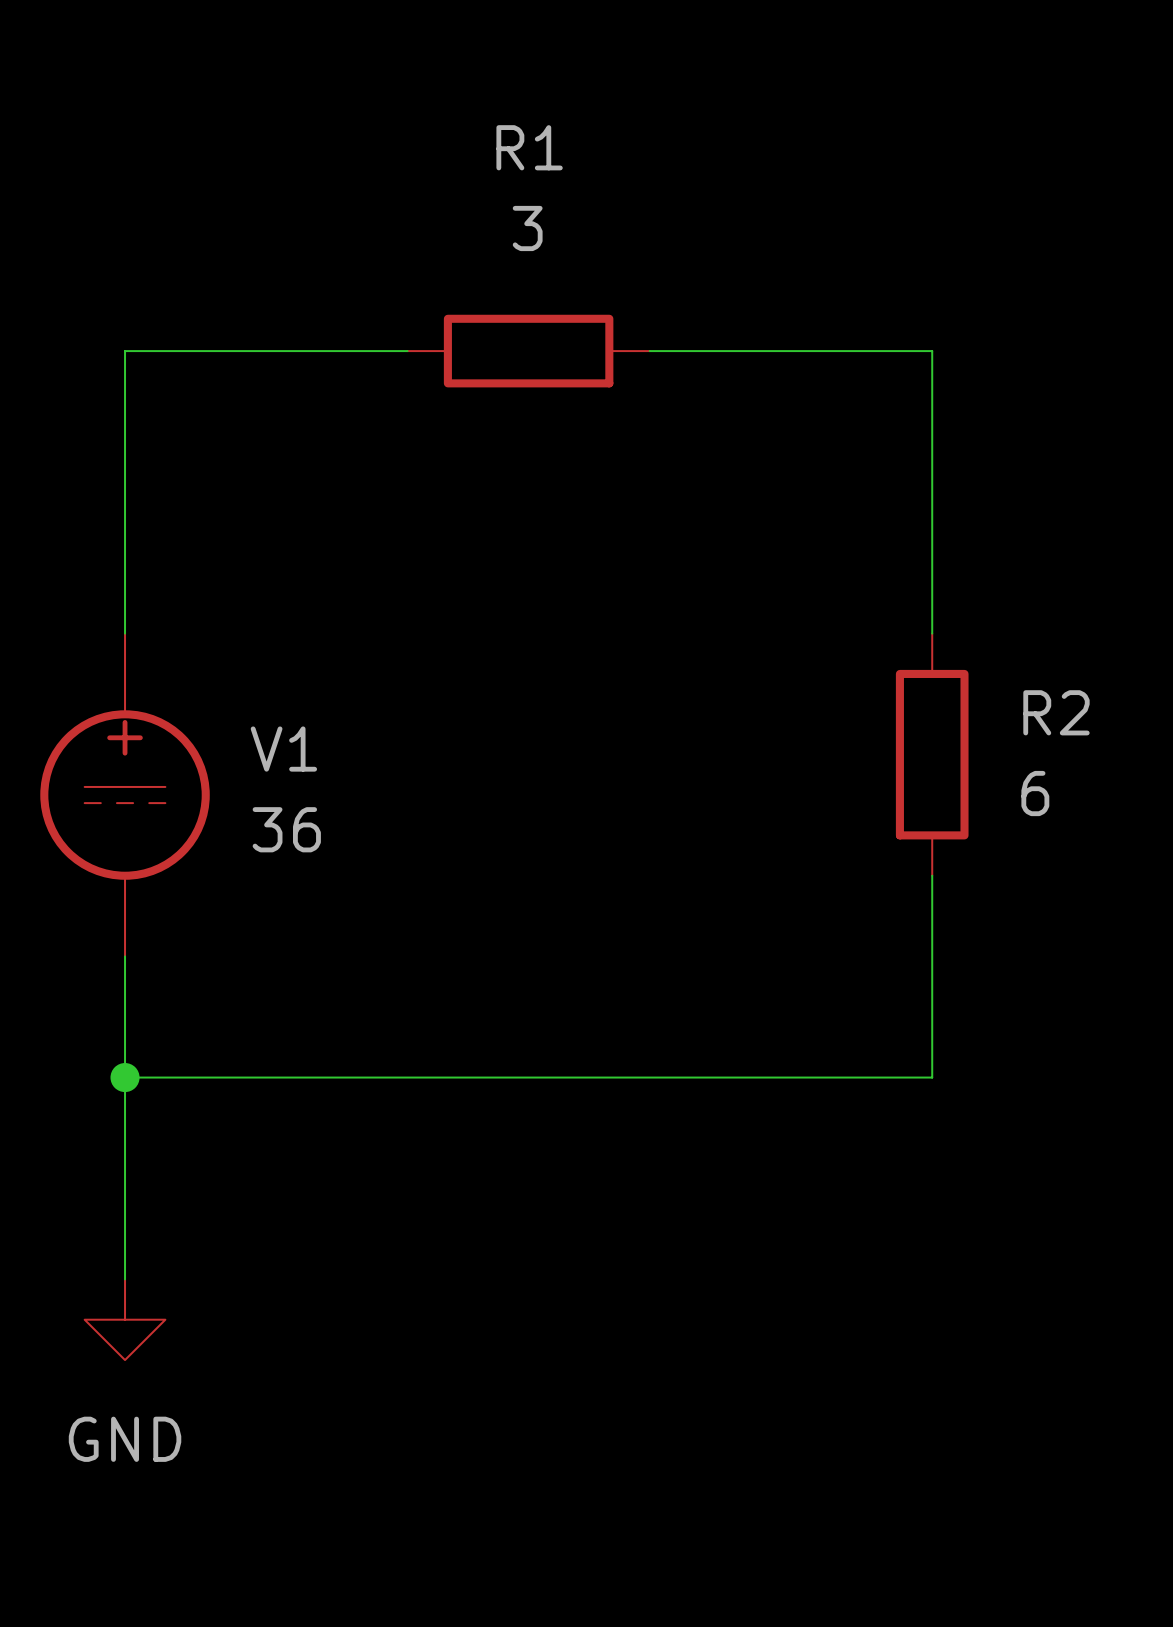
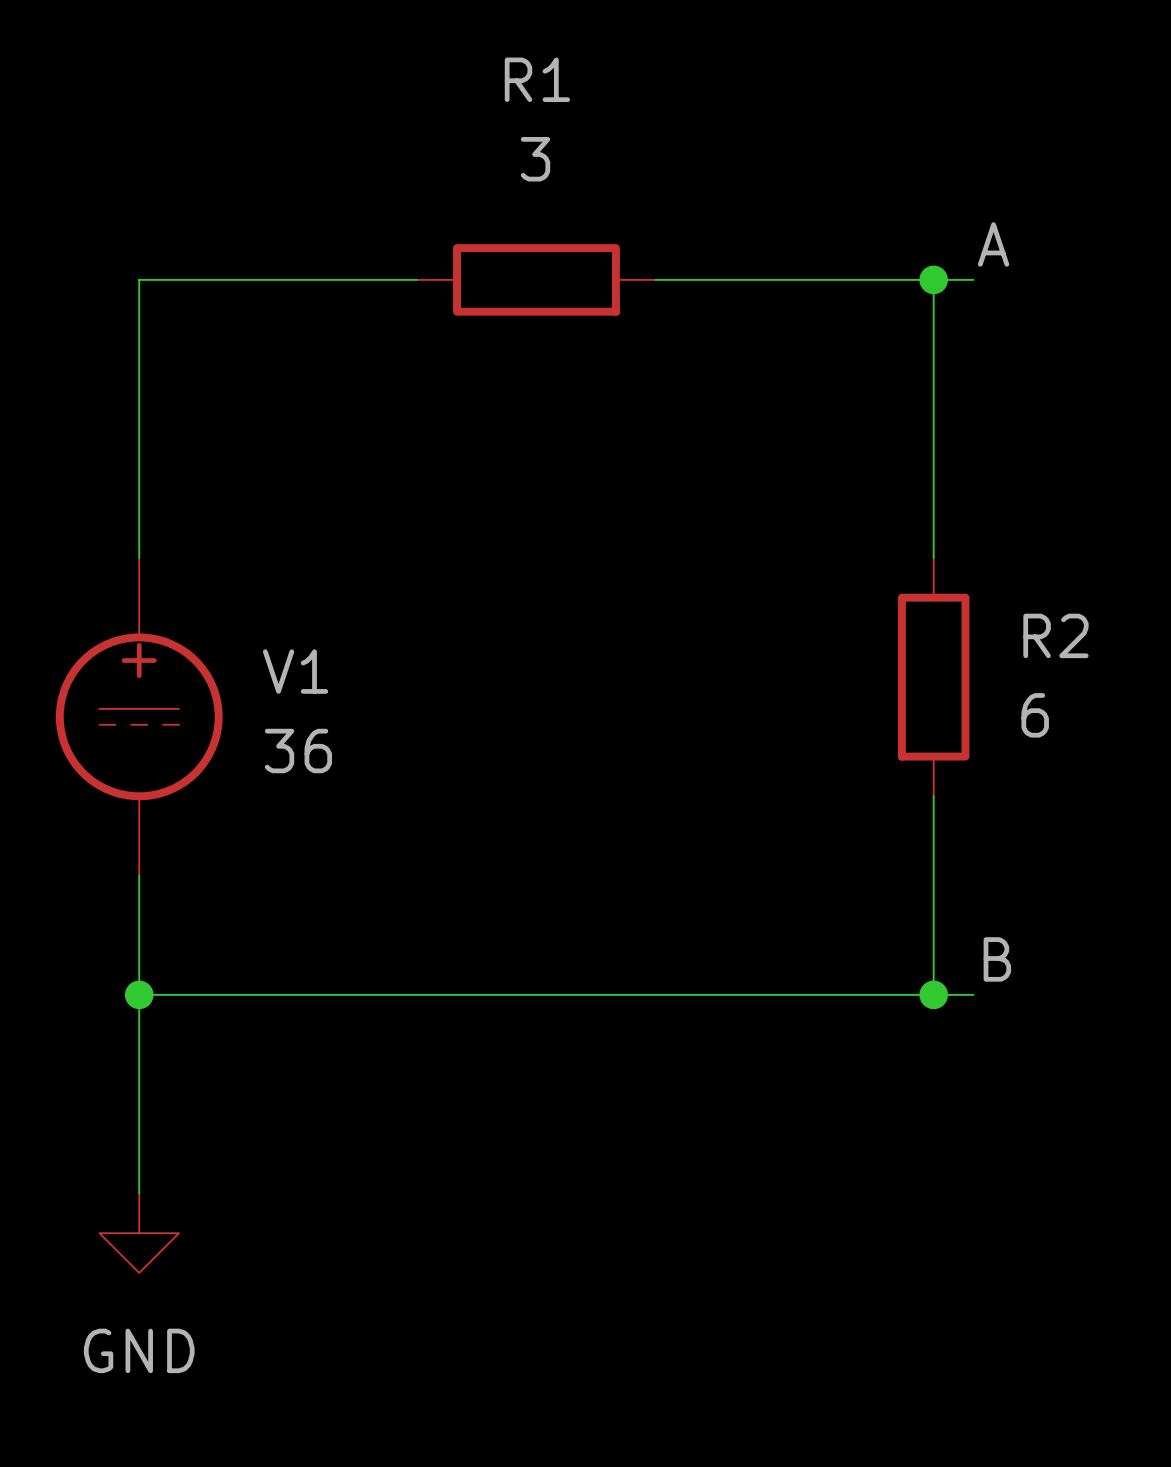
label: none -> A (993, 244)
wire: none -> (933, 279) (973, 279)
junction: none -> (933, 279)
label: none -> B (997, 959)
wire: none -> (933, 994) (973, 994)
junction: none -> (933, 994)

